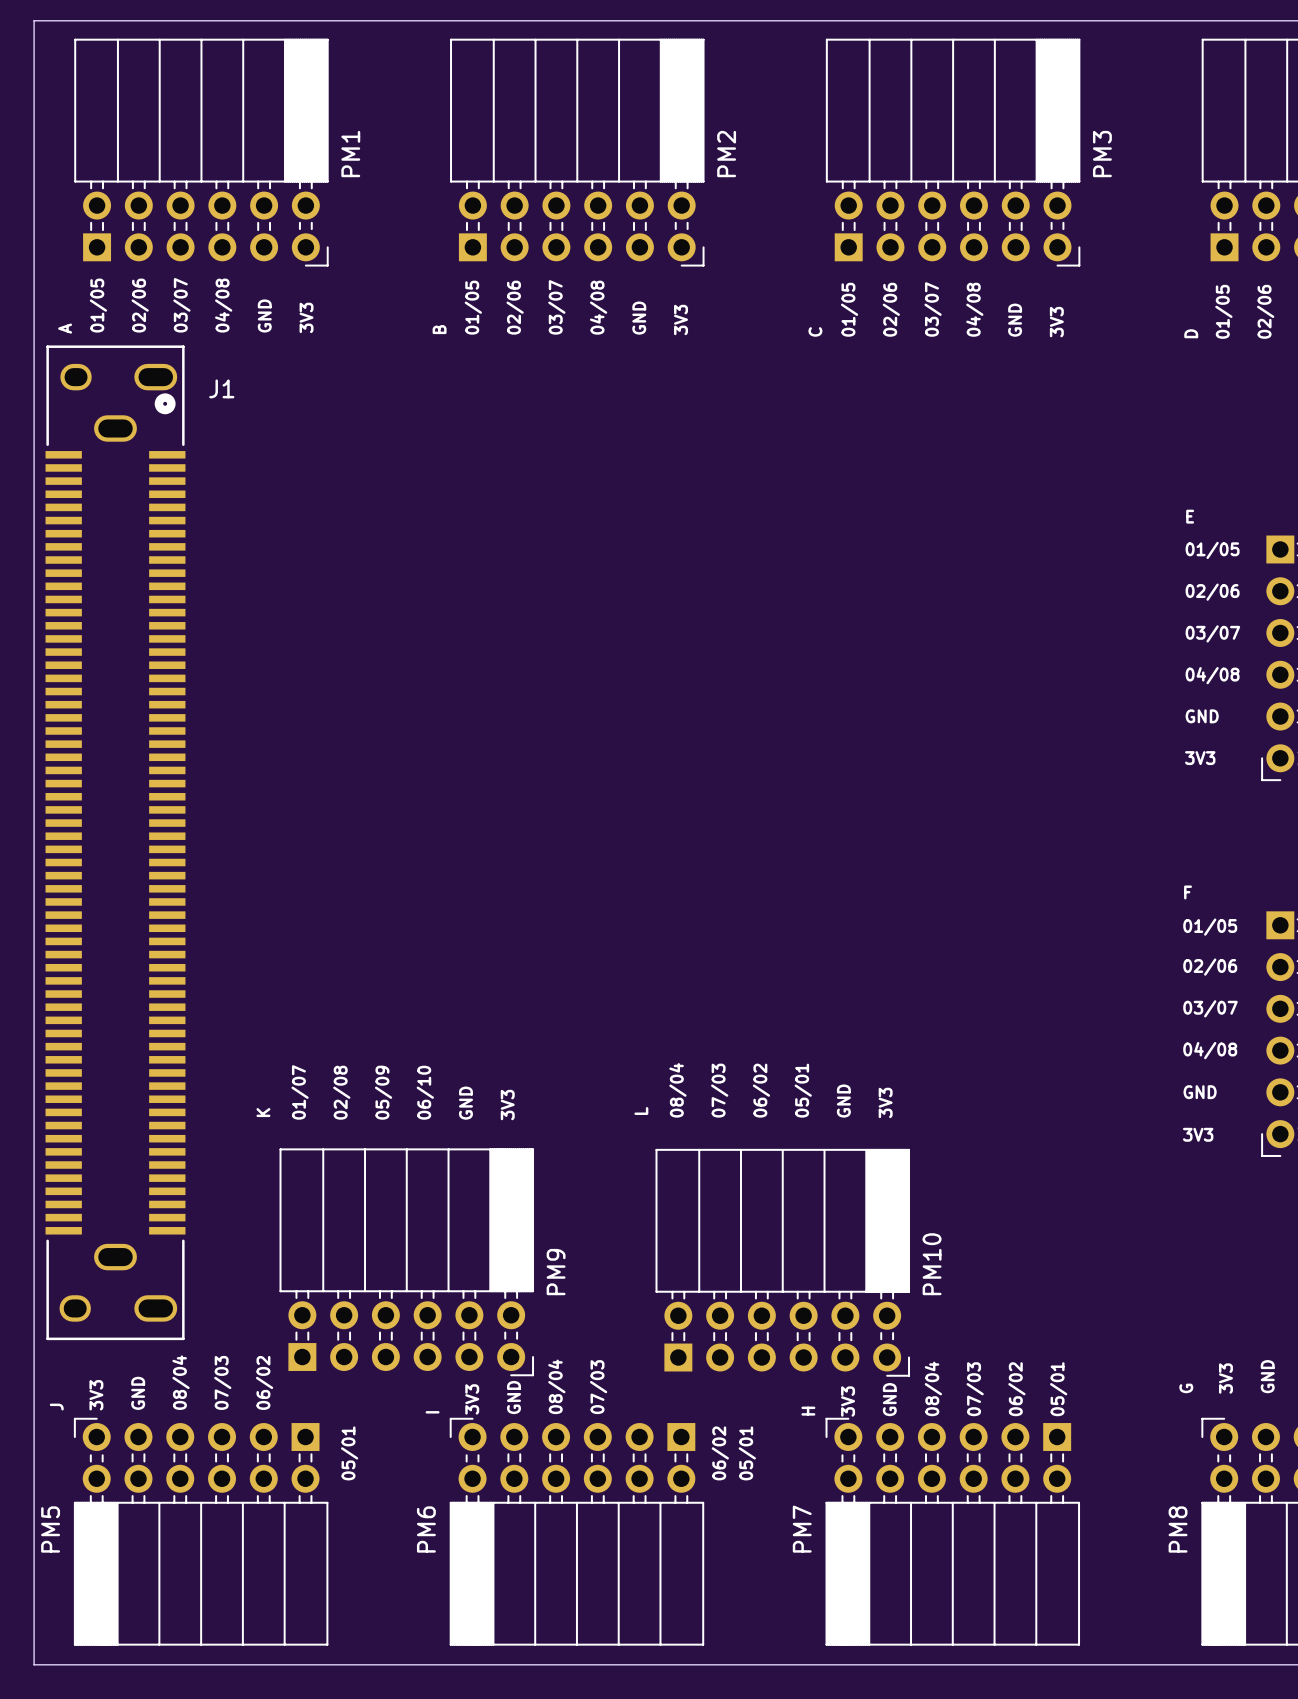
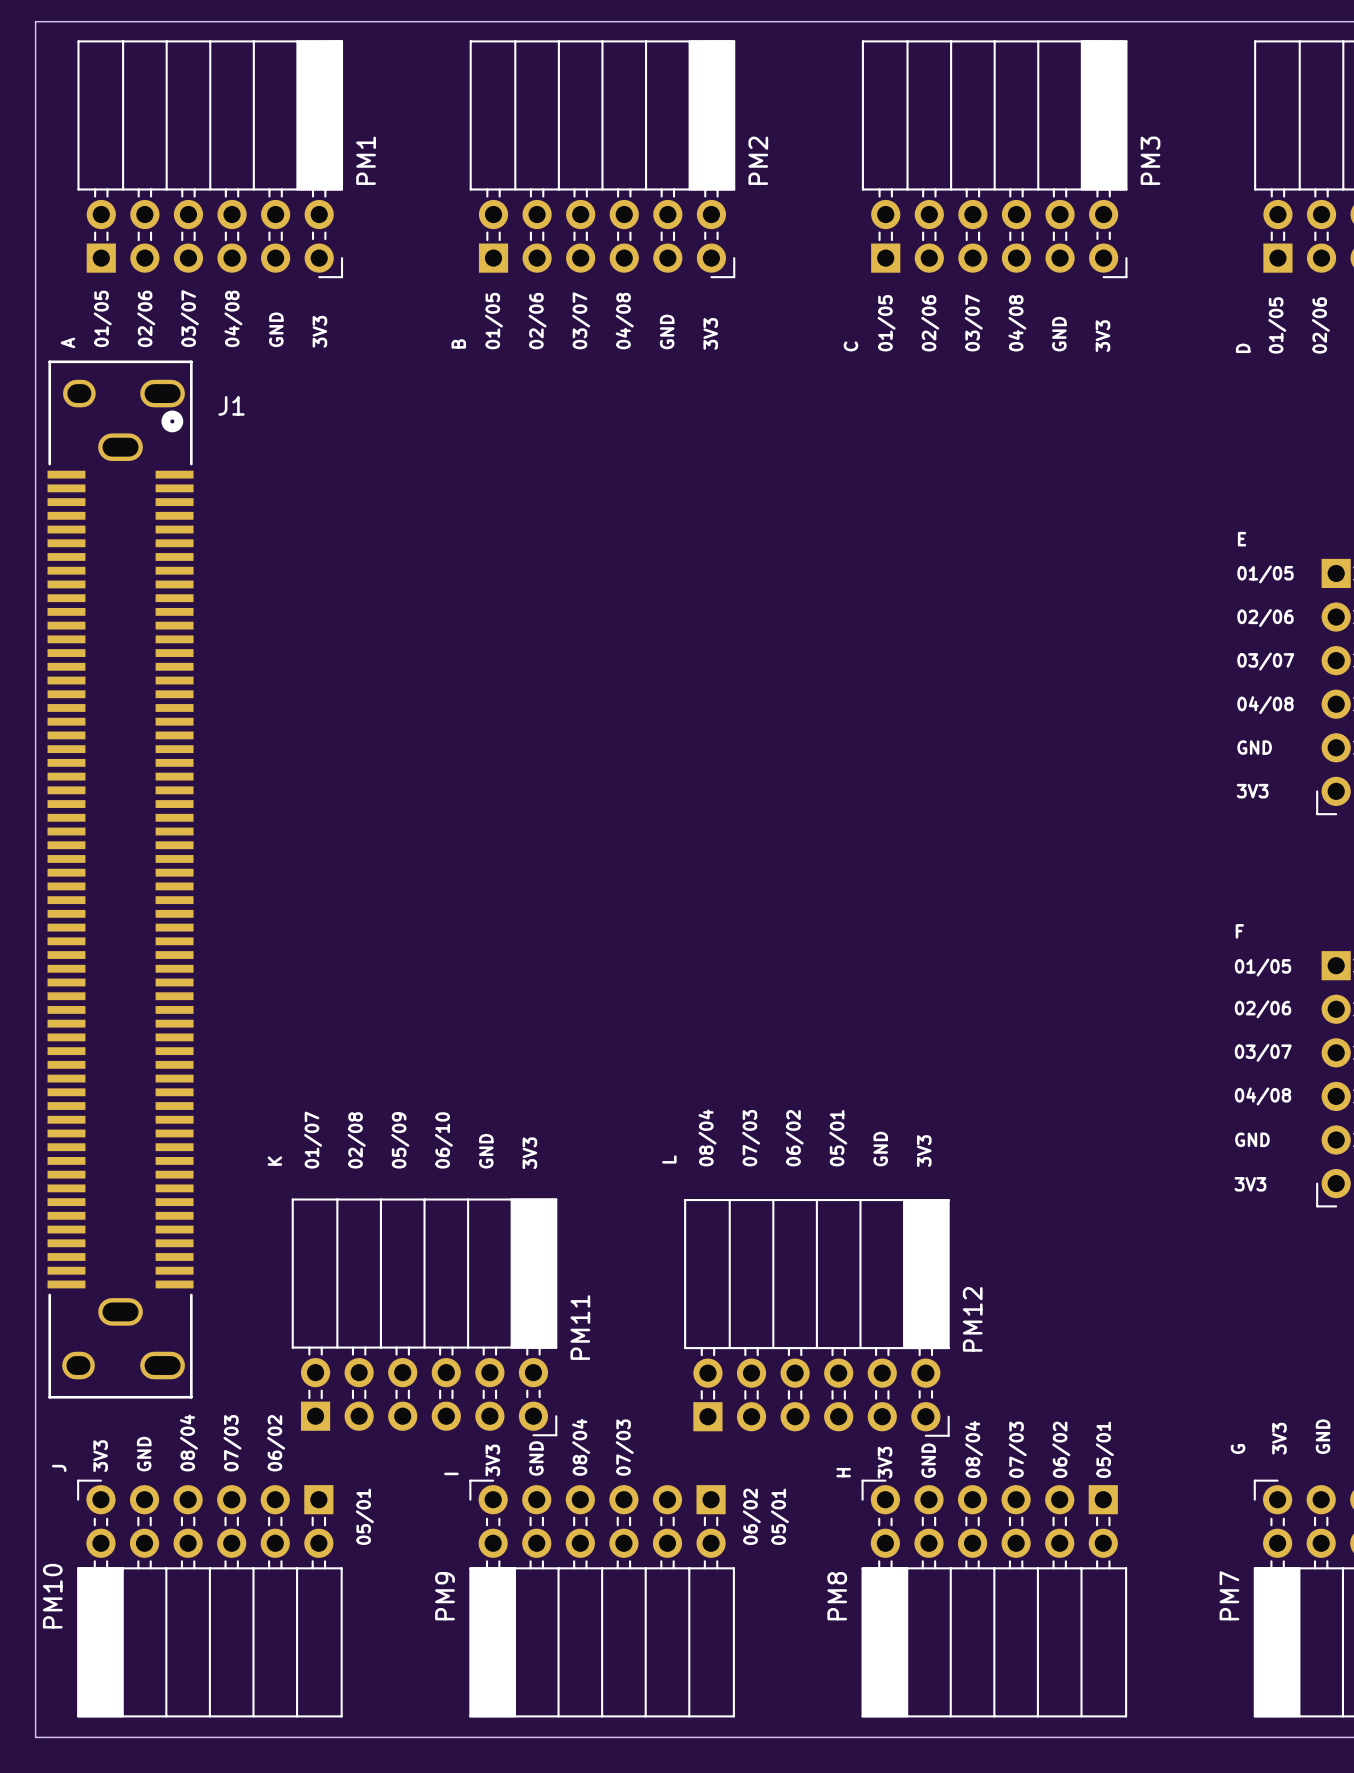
PM10 name: PM10 (932, 1264) -> PM12 (972, 1319)
PM9 name: PM9 (556, 1272) -> PM11 (580, 1327)
PM5 name: PM5 (50, 1529) -> PM10 (52, 1596)
PM6 name: PM6 (426, 1529) -> PM9 (445, 1596)
PM7 name: PM7 (802, 1529) -> PM8 (837, 1596)
PM8 name: PM8 (1178, 1529) -> PM7 (1229, 1595)

